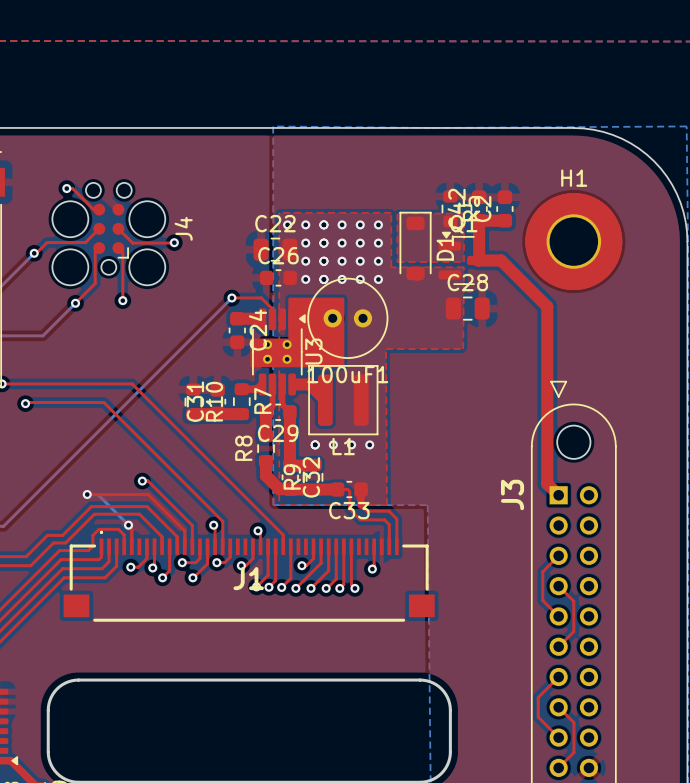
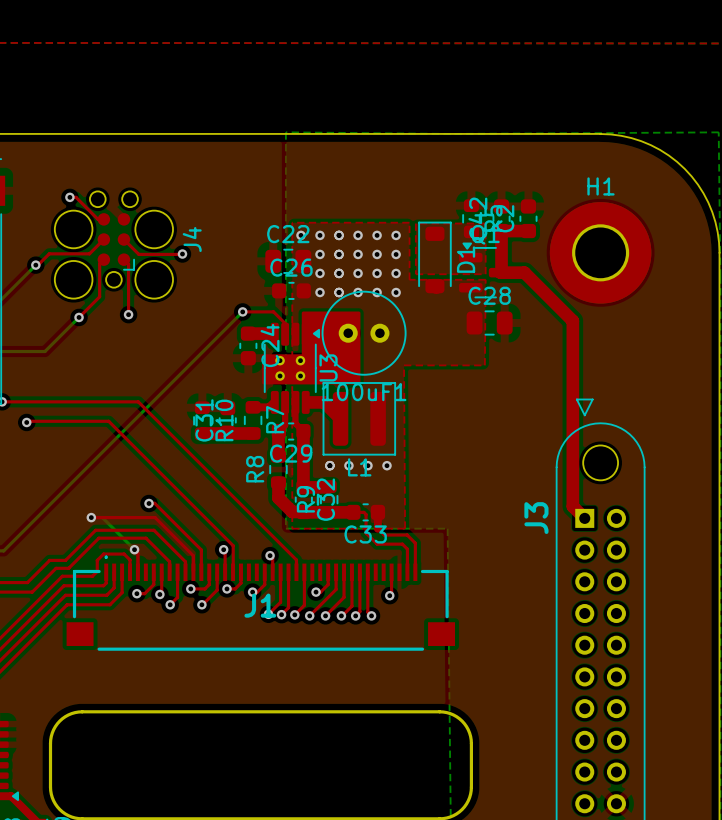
top track: (558, 555) (542, 571) (542, 600) (558, 616) -> none
top track: (558, 586) (573, 601) (573, 631) (558, 646) -> none
top track: (558, 677) (538, 697) (538, 717) (558, 737) -> none
top track: (558, 707) (573, 722) (573, 752) (558, 767) -> none

